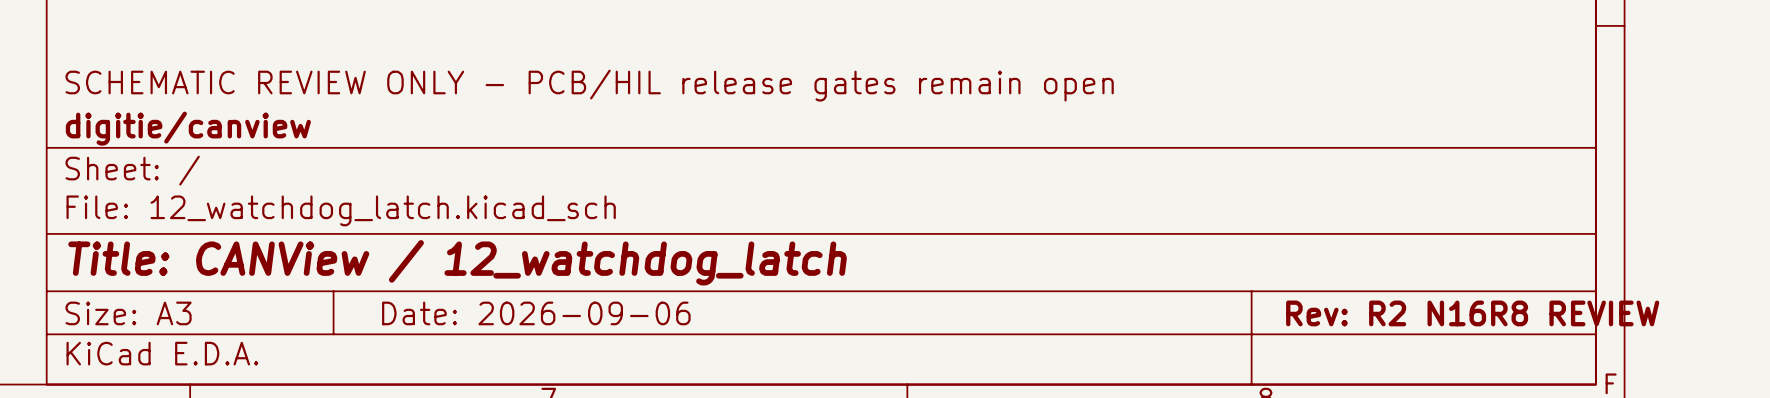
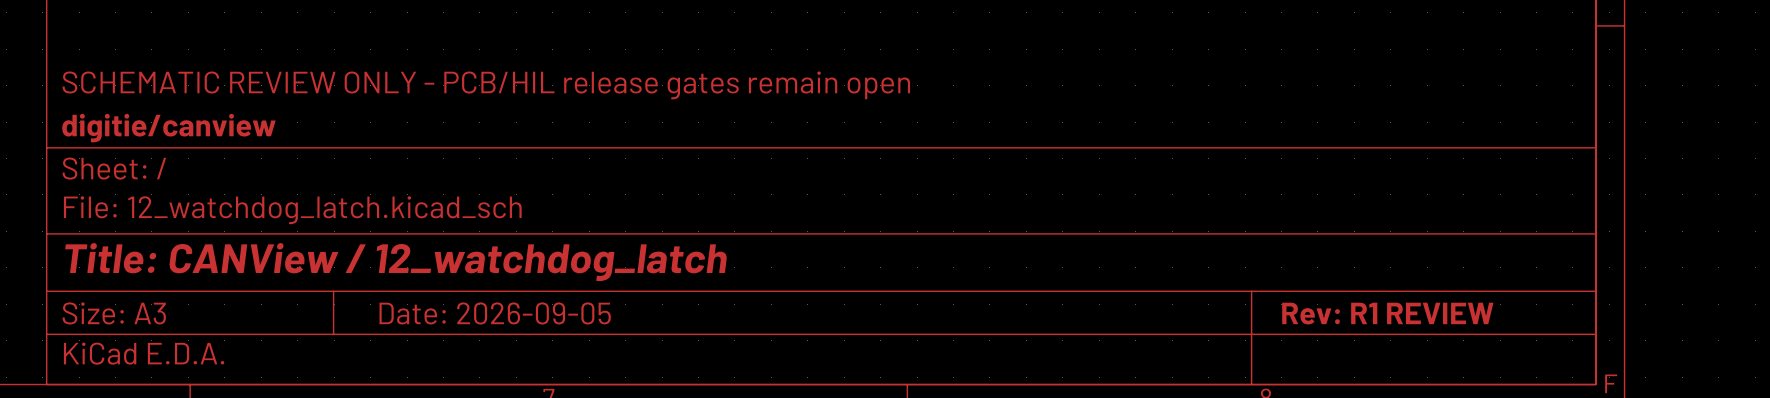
title block: Date: 2026-09-06 (536, 313) -> Date: 2026-09-05 (495, 313)
title block: Rev: R2 N16R8 REVIEW (1472, 313) -> Rev: R1 REVIEW (1387, 313)

